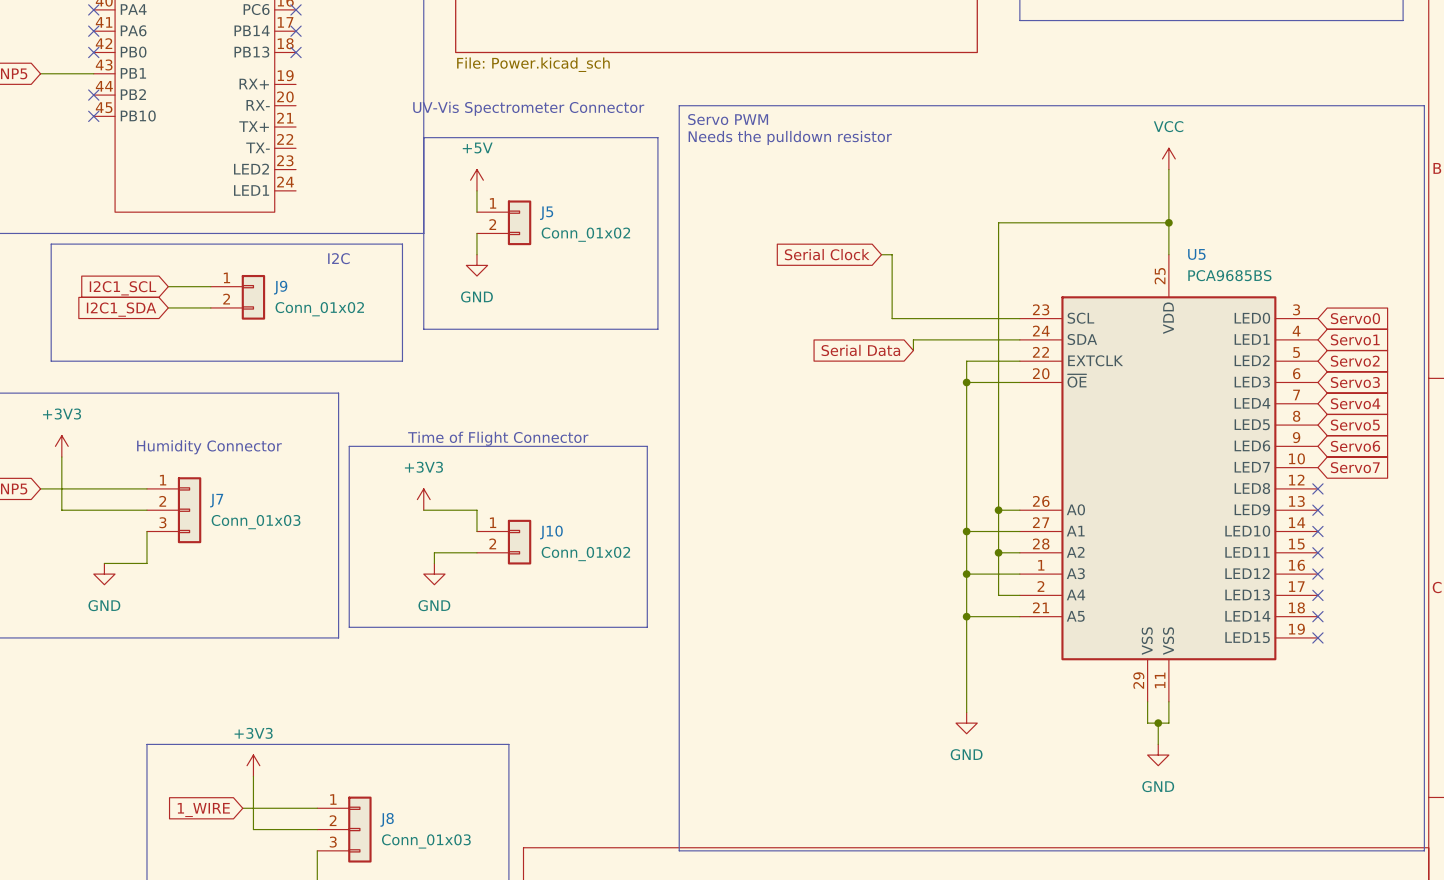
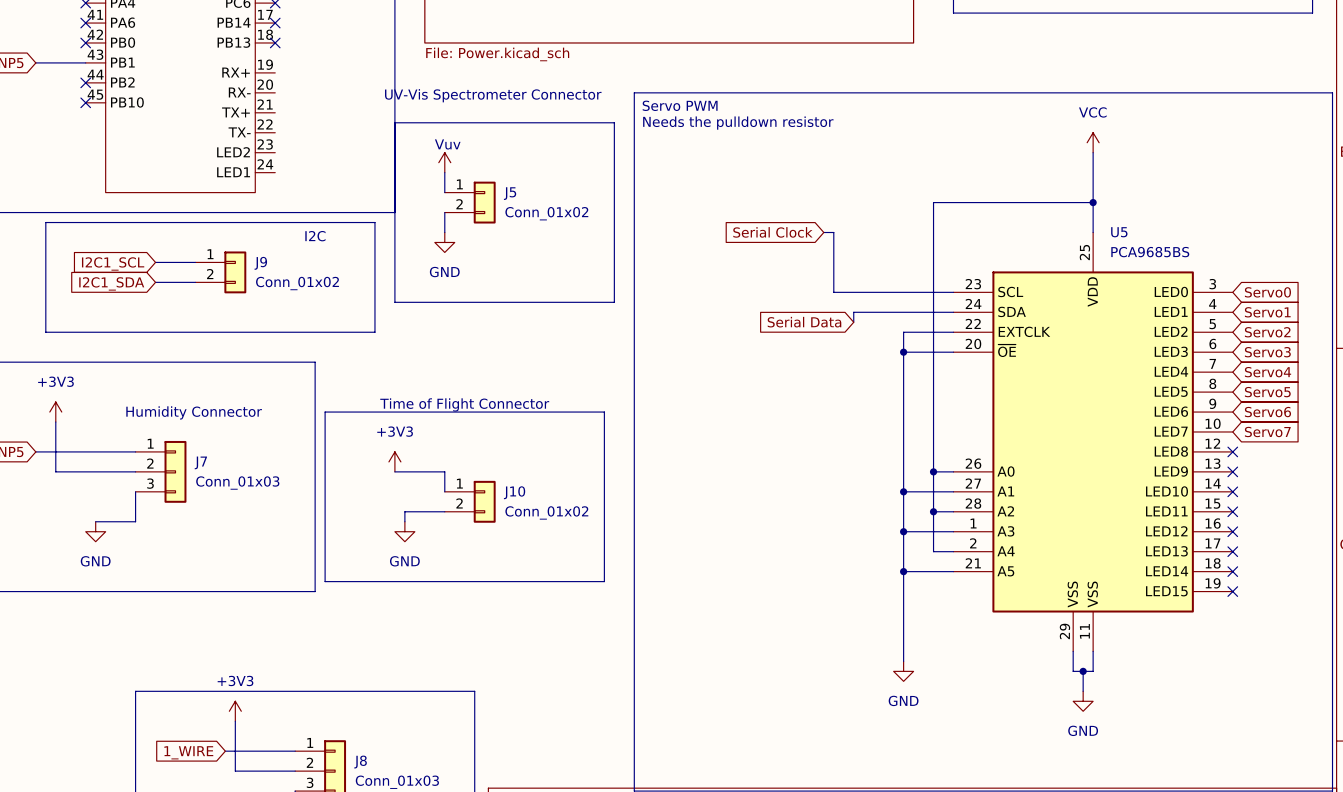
power symbol: +5V (476, 180) -> Vuv (444, 162)

